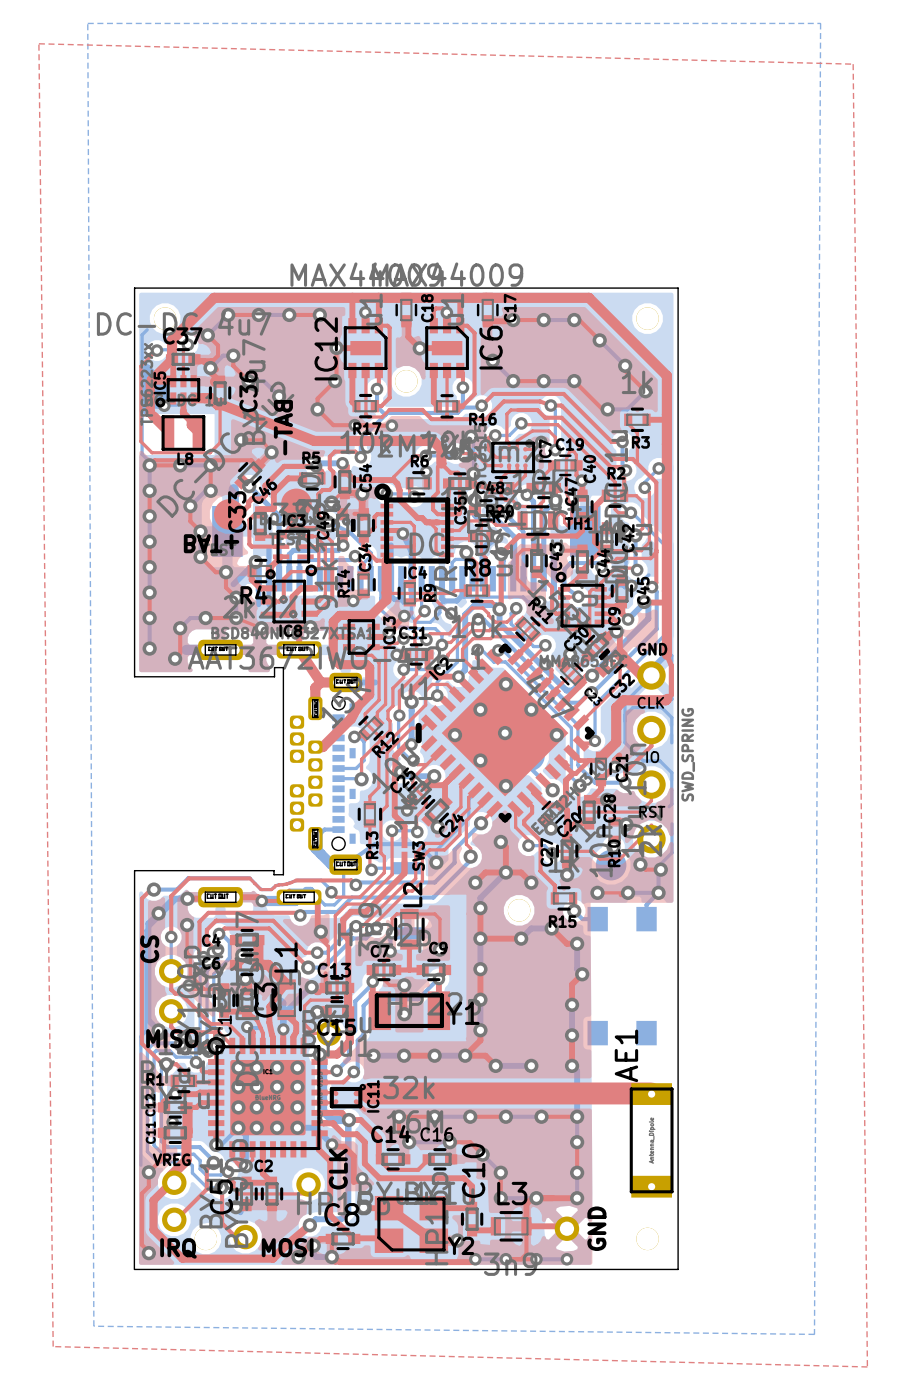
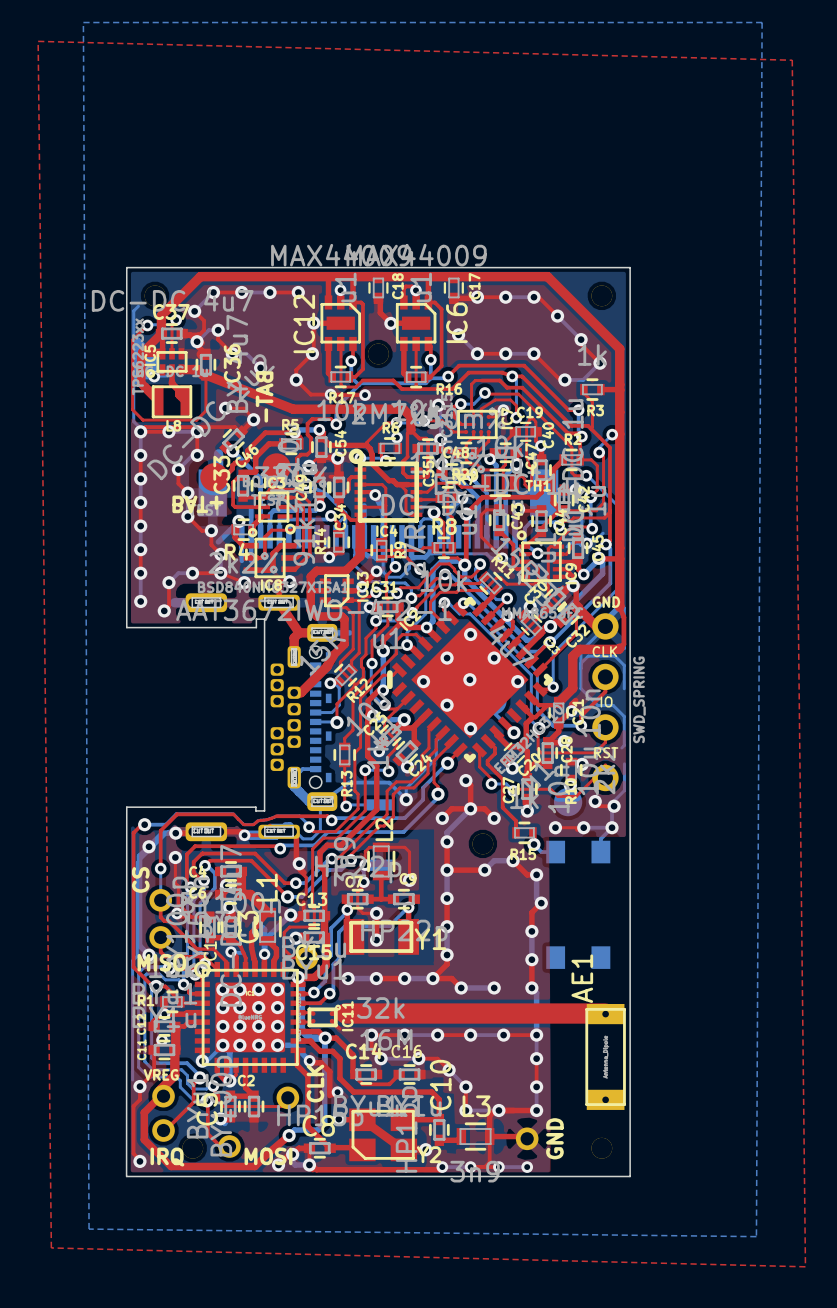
top track: none -> (376, 776) (376, 799)
SW3: (404, 849) -> none

